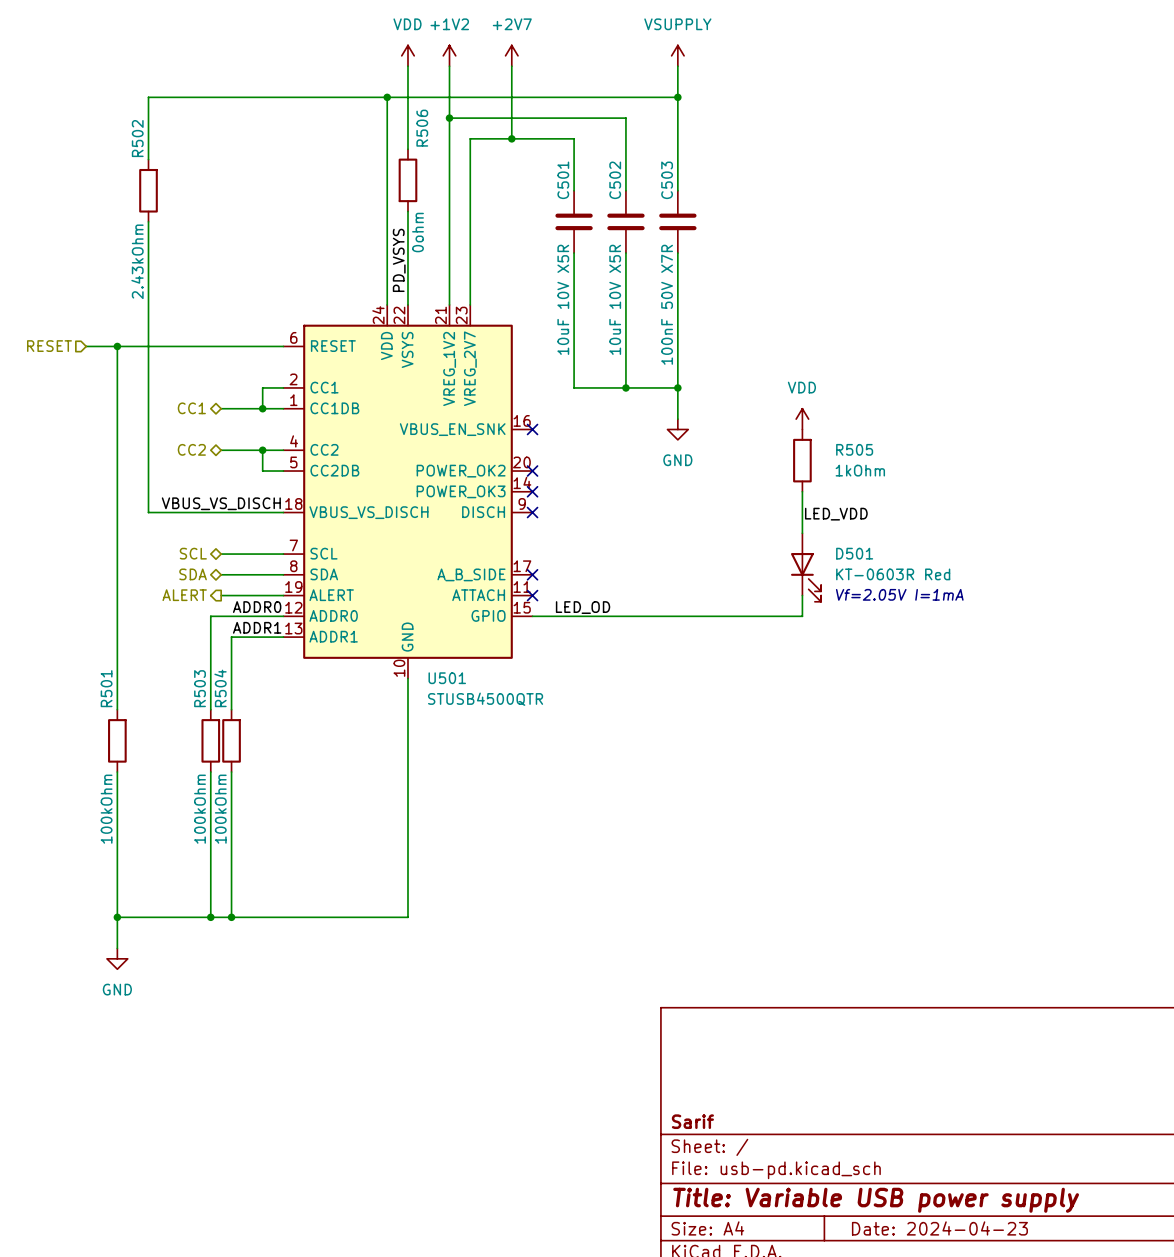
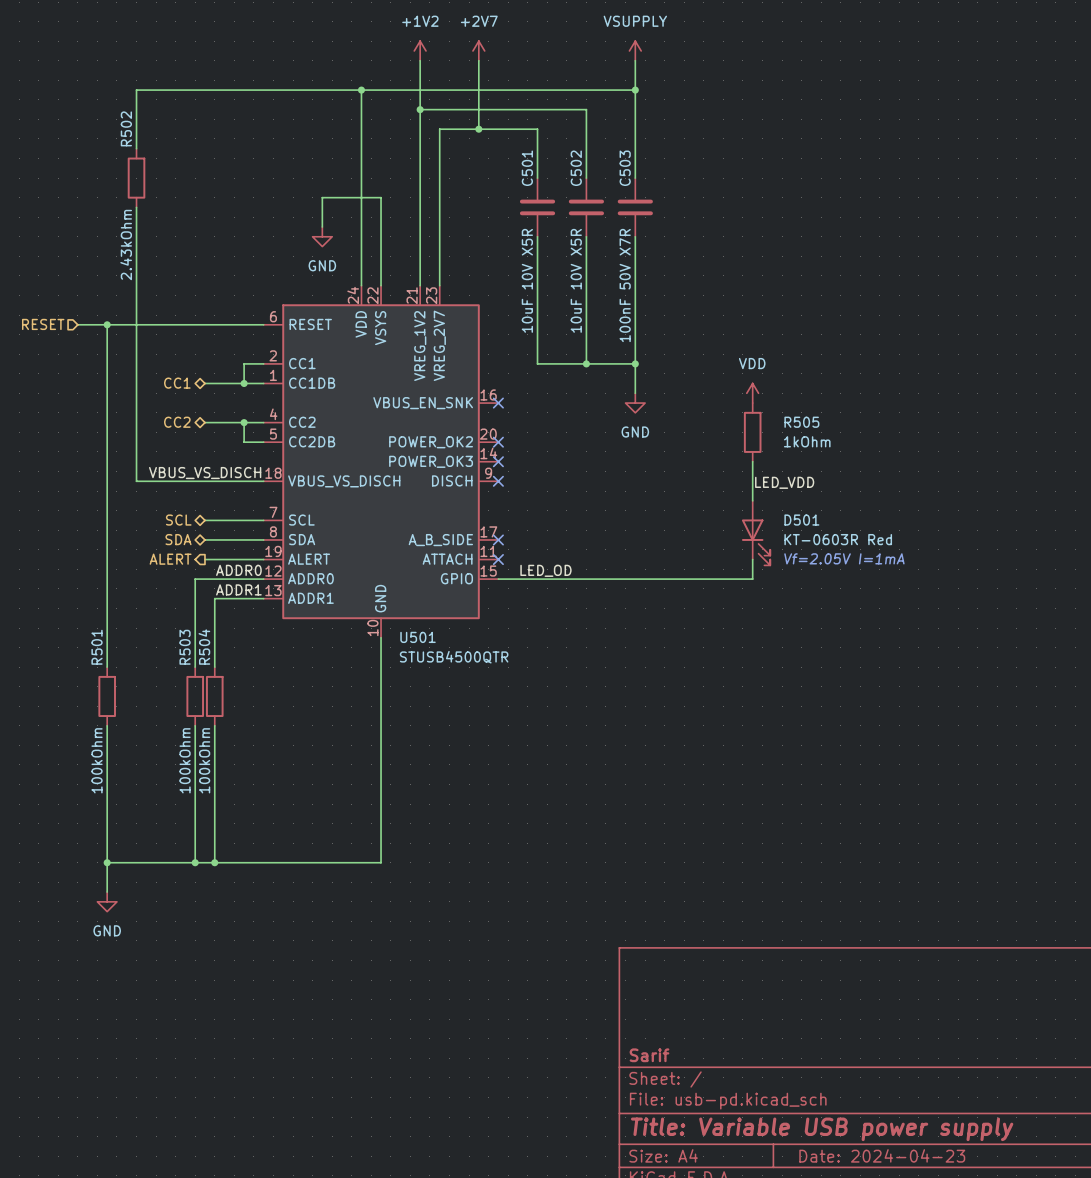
power symbol: VDD (407, 55) -> none
wire: (407, 66) (407, 149) -> none
R506: 0ohm (407, 180) -> none
wire: none -> (381, 197) (322, 197) (322, 227)
power symbol: none -> GND (322, 236)
label: PD_VSYS (399, 260) -> none

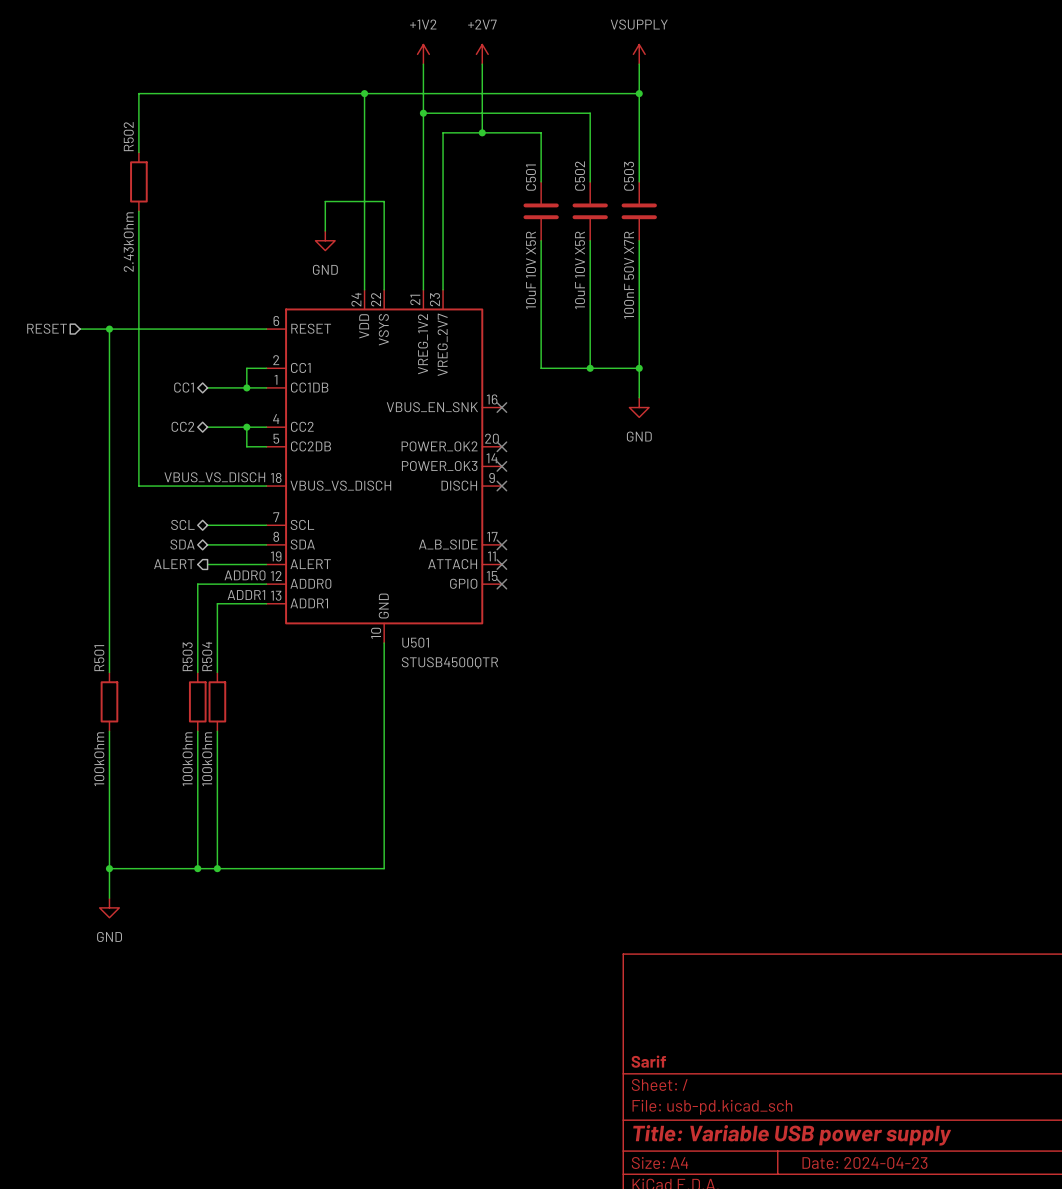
power symbol: VDD (752, 393) -> none
R505: 1kOhm (752, 432) -> none
wire: (752, 461) (752, 500) -> none
label: LED_VDD (784, 482) -> none
D501: KT-0603R Red (756, 533) -> none
text: Vf=2.05V I=1mA (844, 558) -> none
wire: (752, 559) (752, 579) (498, 579) -> none
label: LED_OD (545, 570) -> none
no-connect mark: none -> (501, 584)

